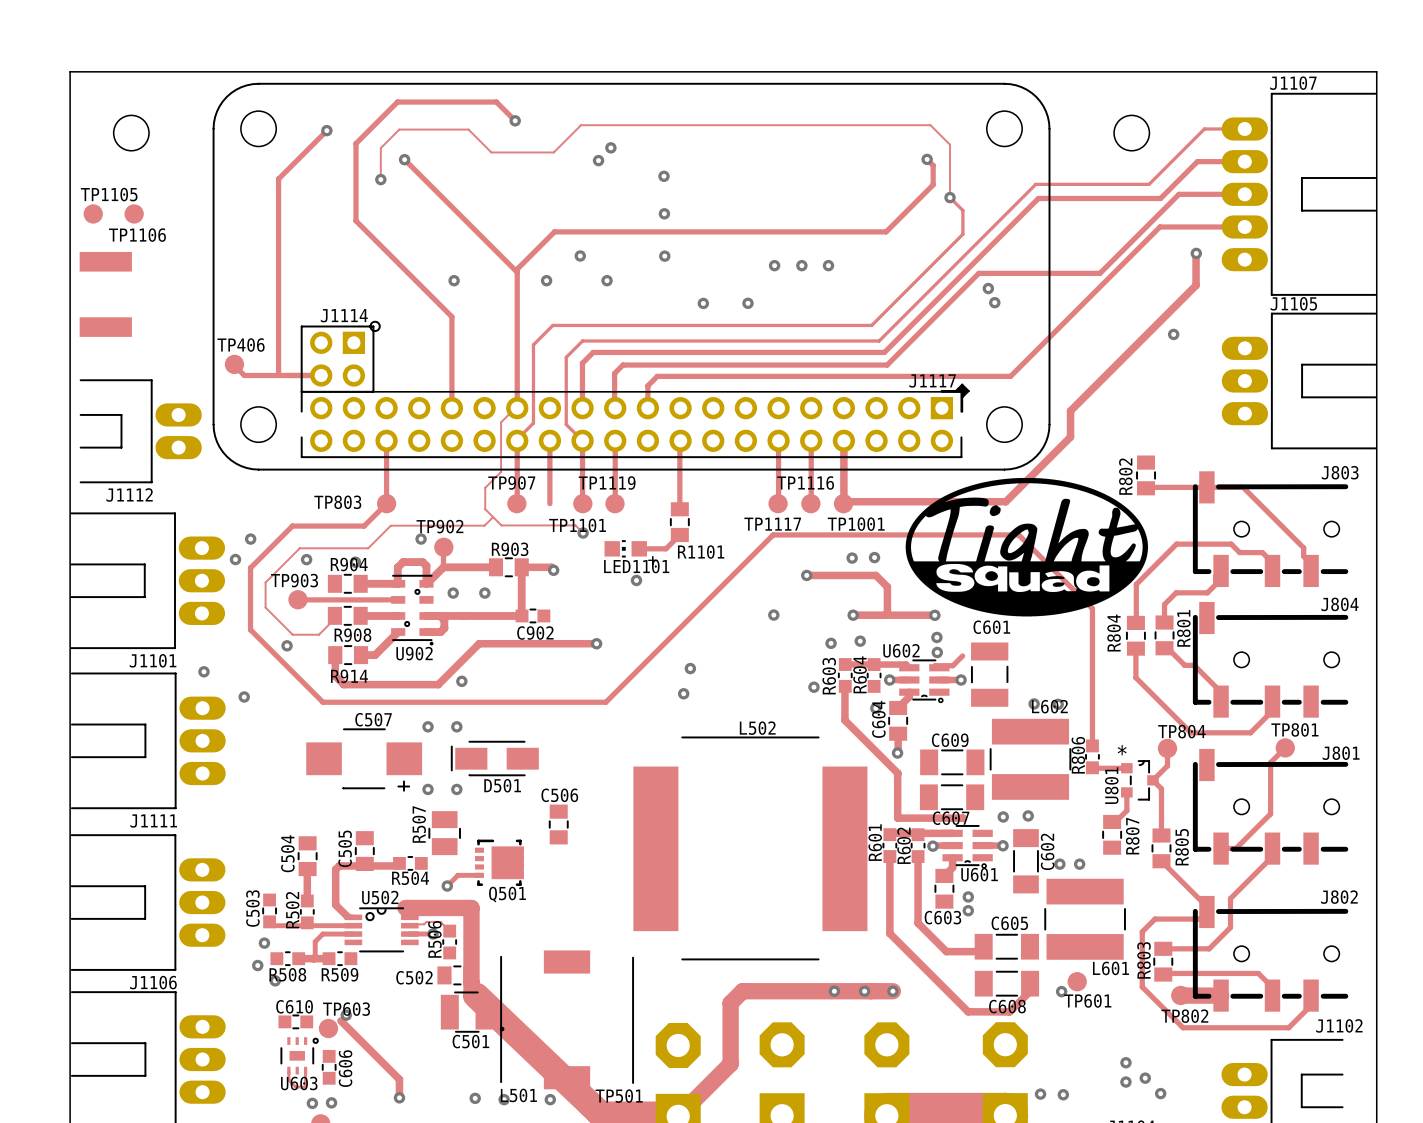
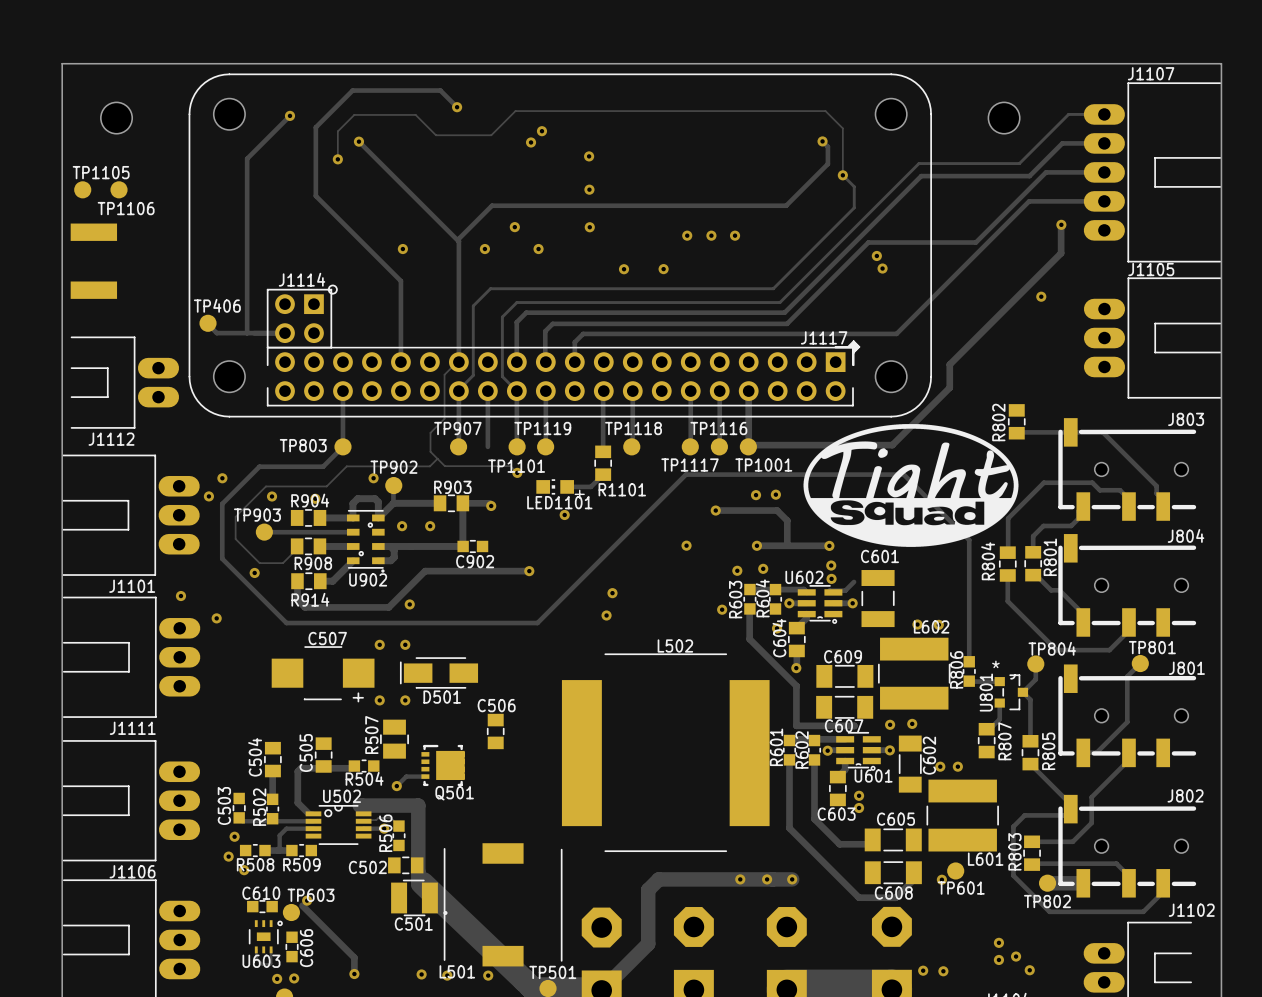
track: none -> (632, 391) (631, 446)
TP1118: none -> (631, 446)

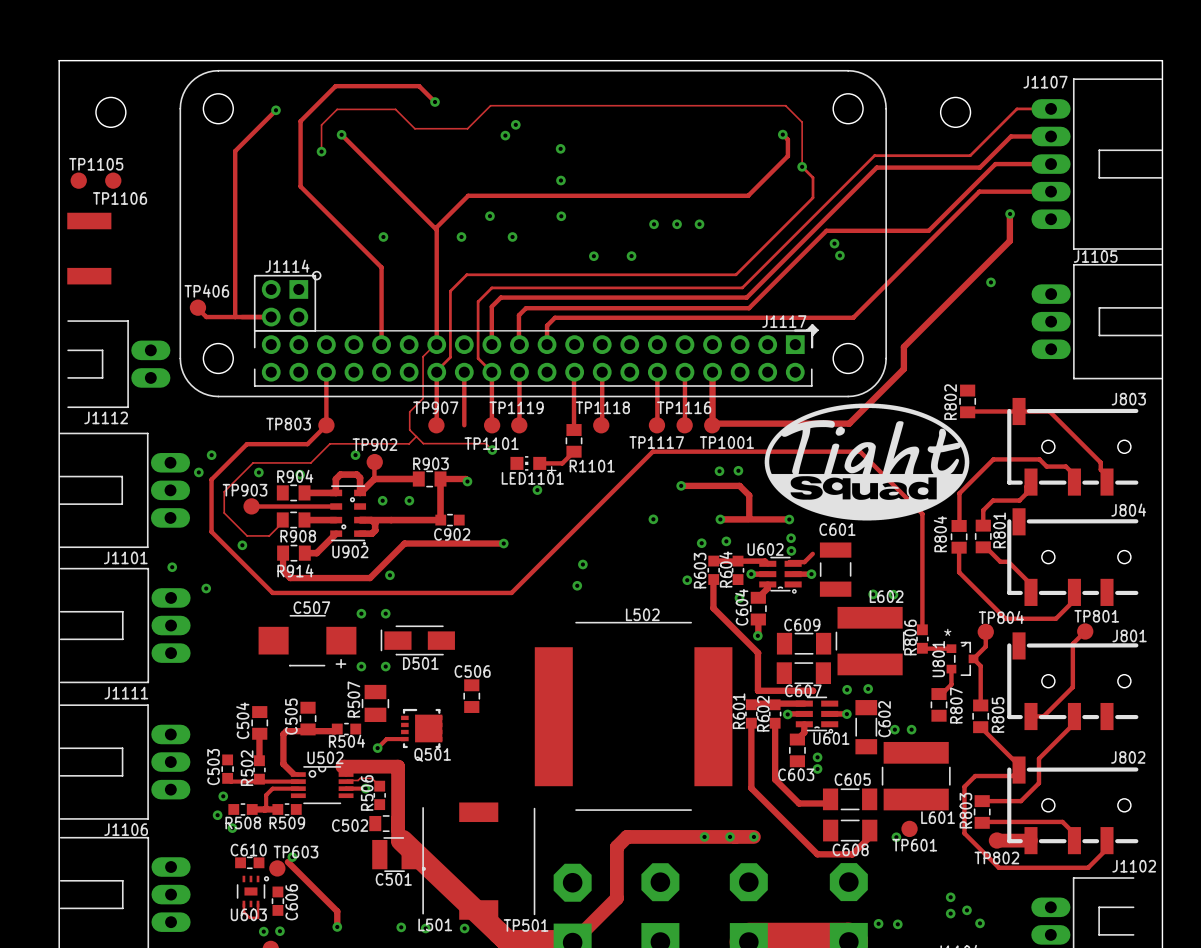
J1107 name position: J1107 (1151, 73) -> J1107 (1045, 82)

